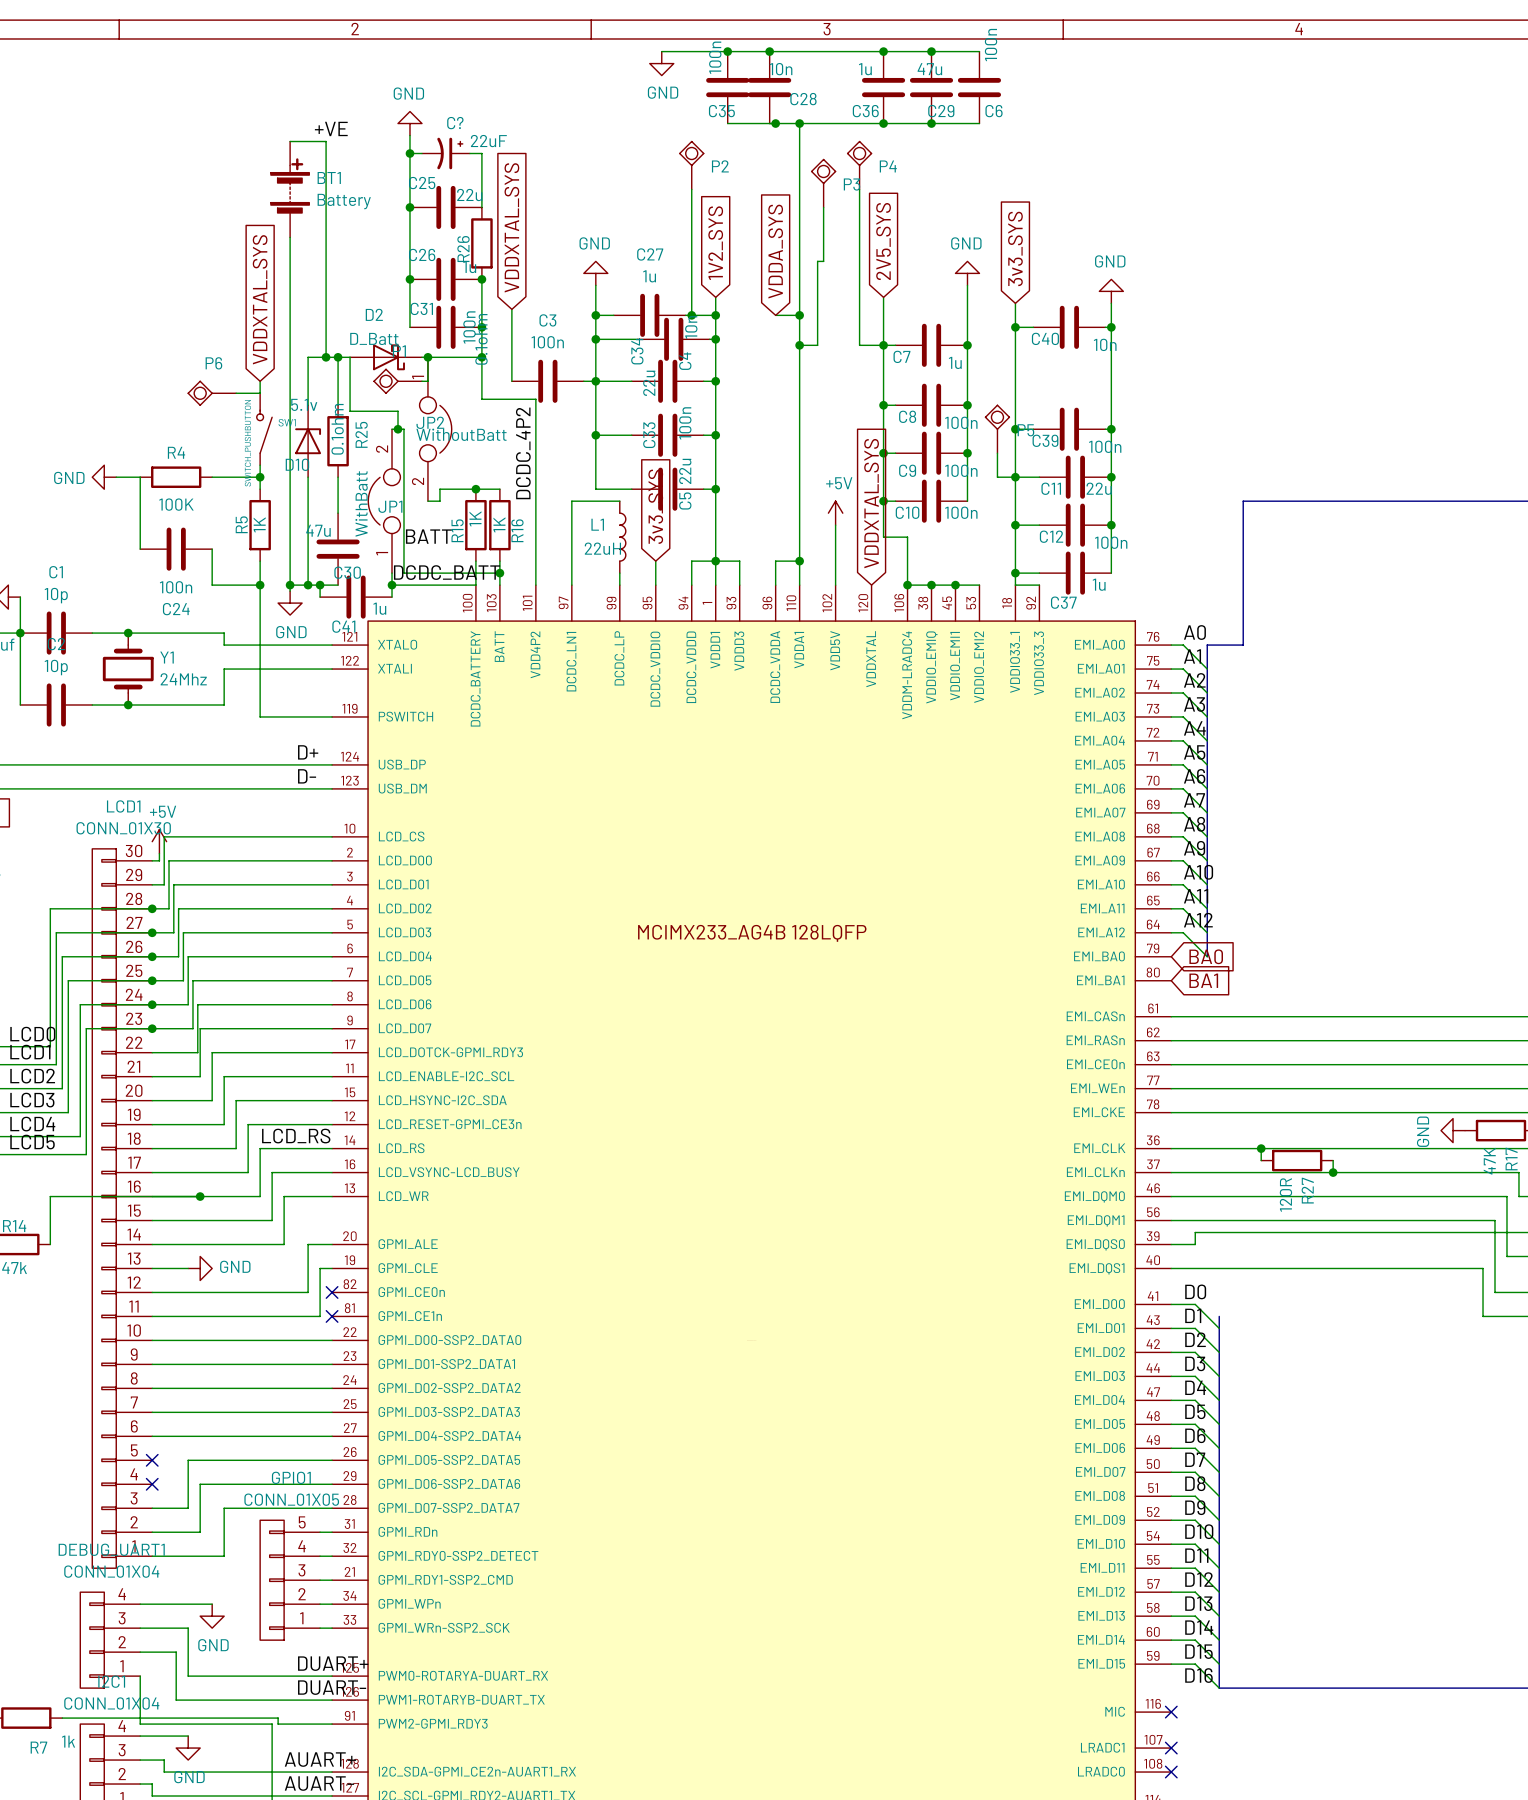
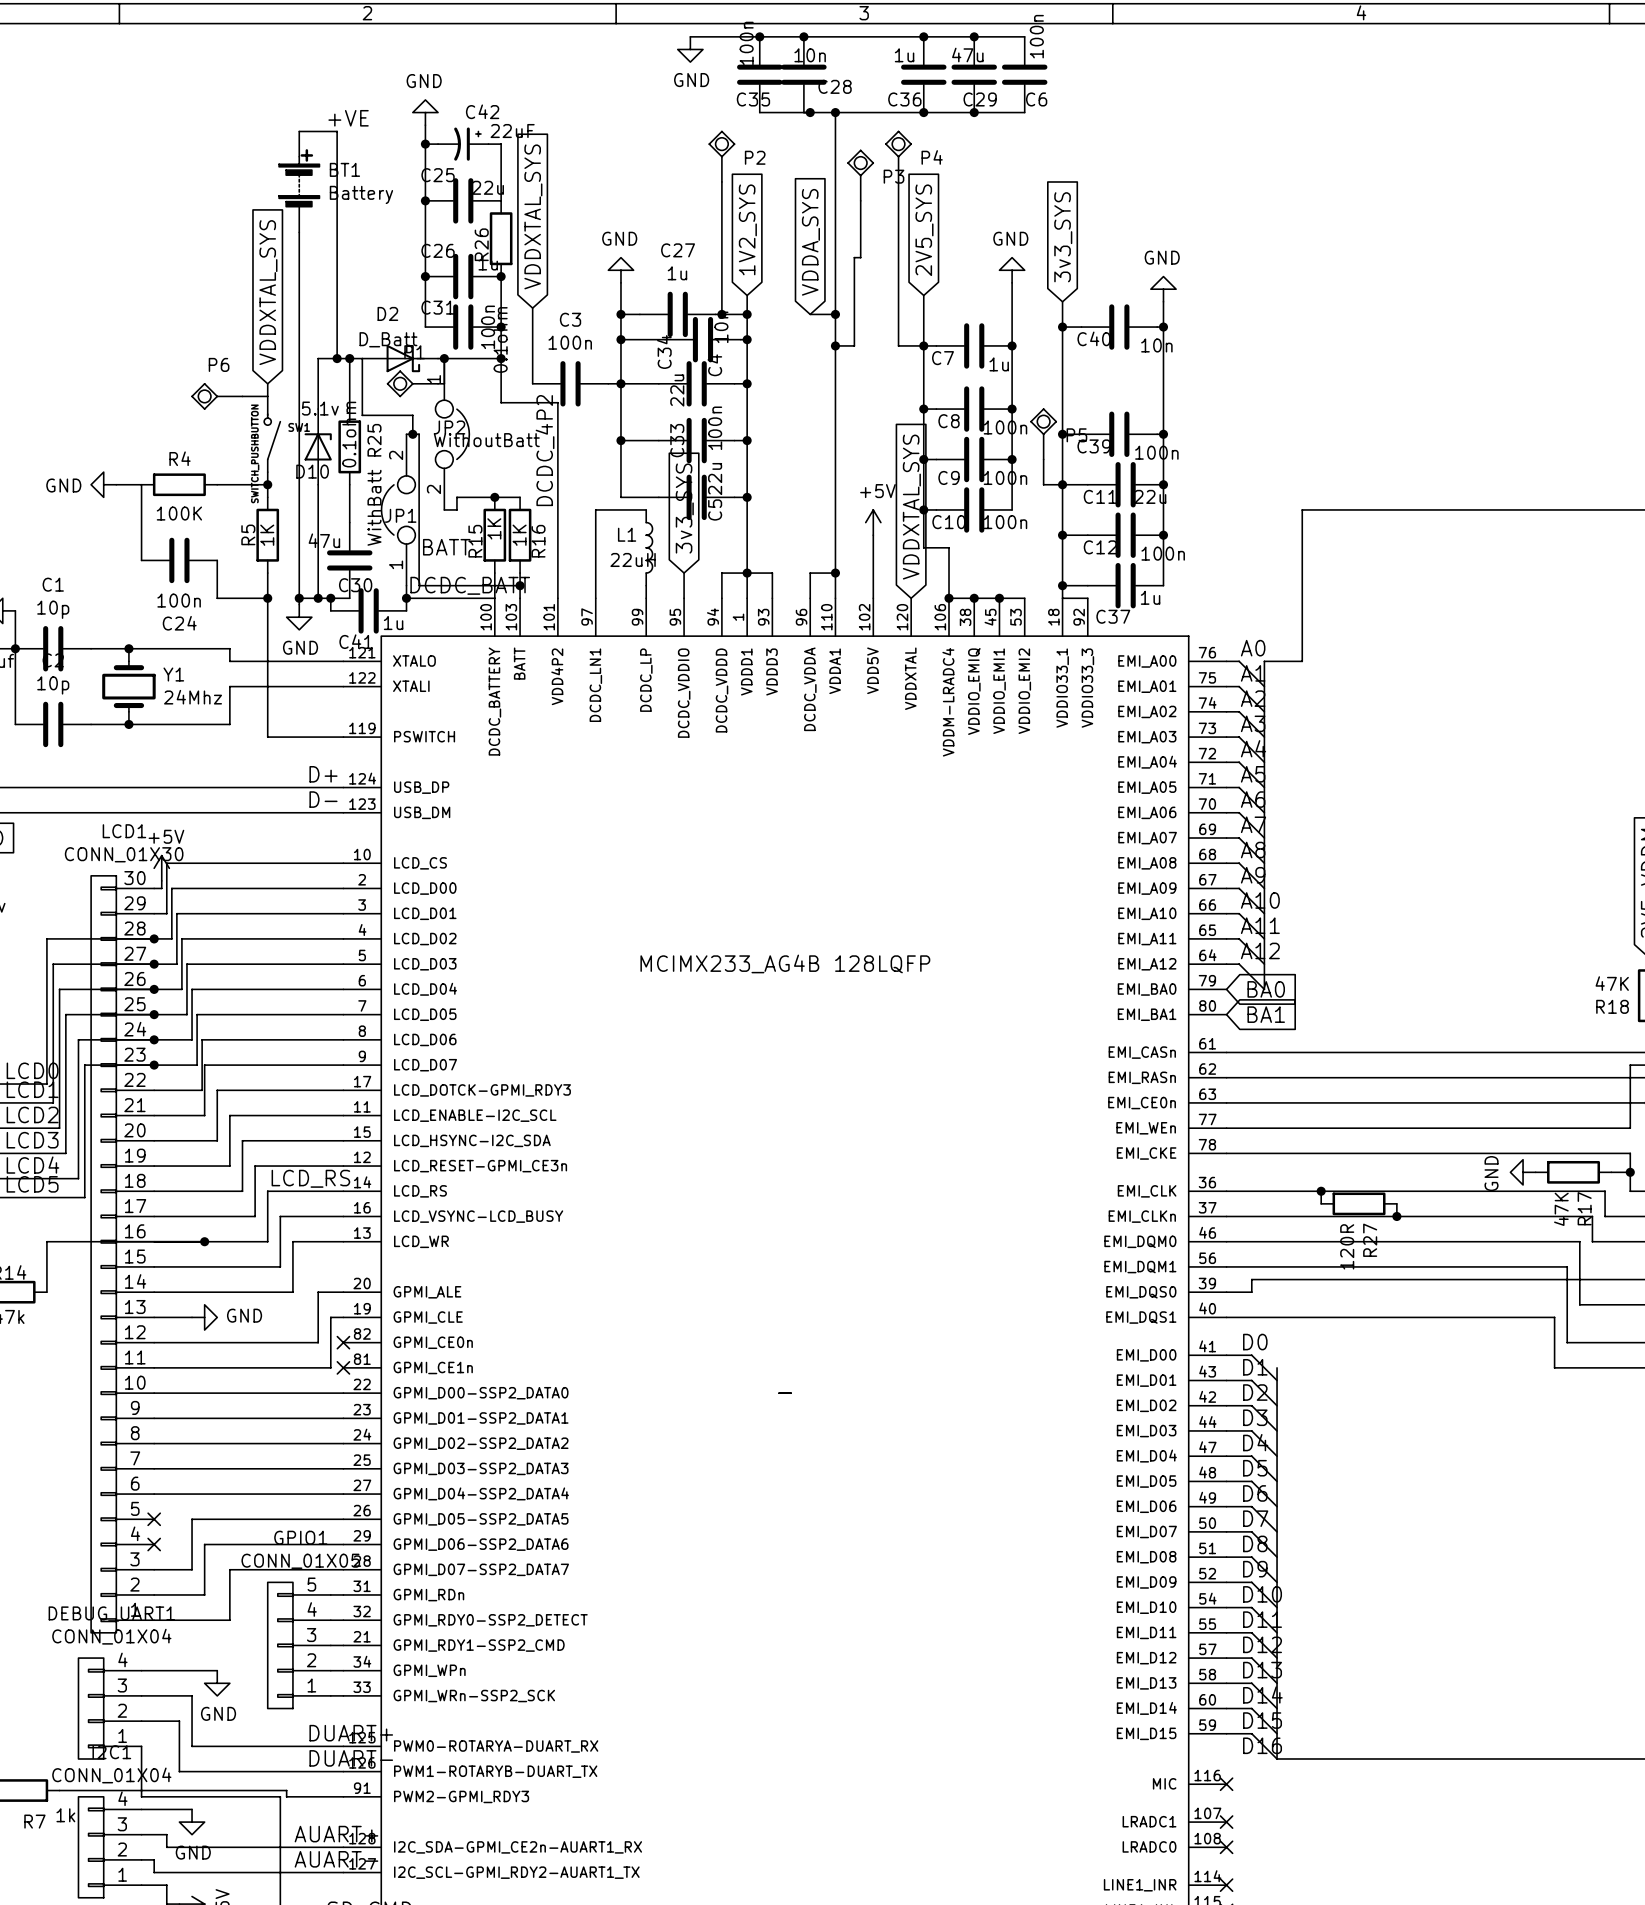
C? name: C? (455, 123) -> C42 (482, 111)

